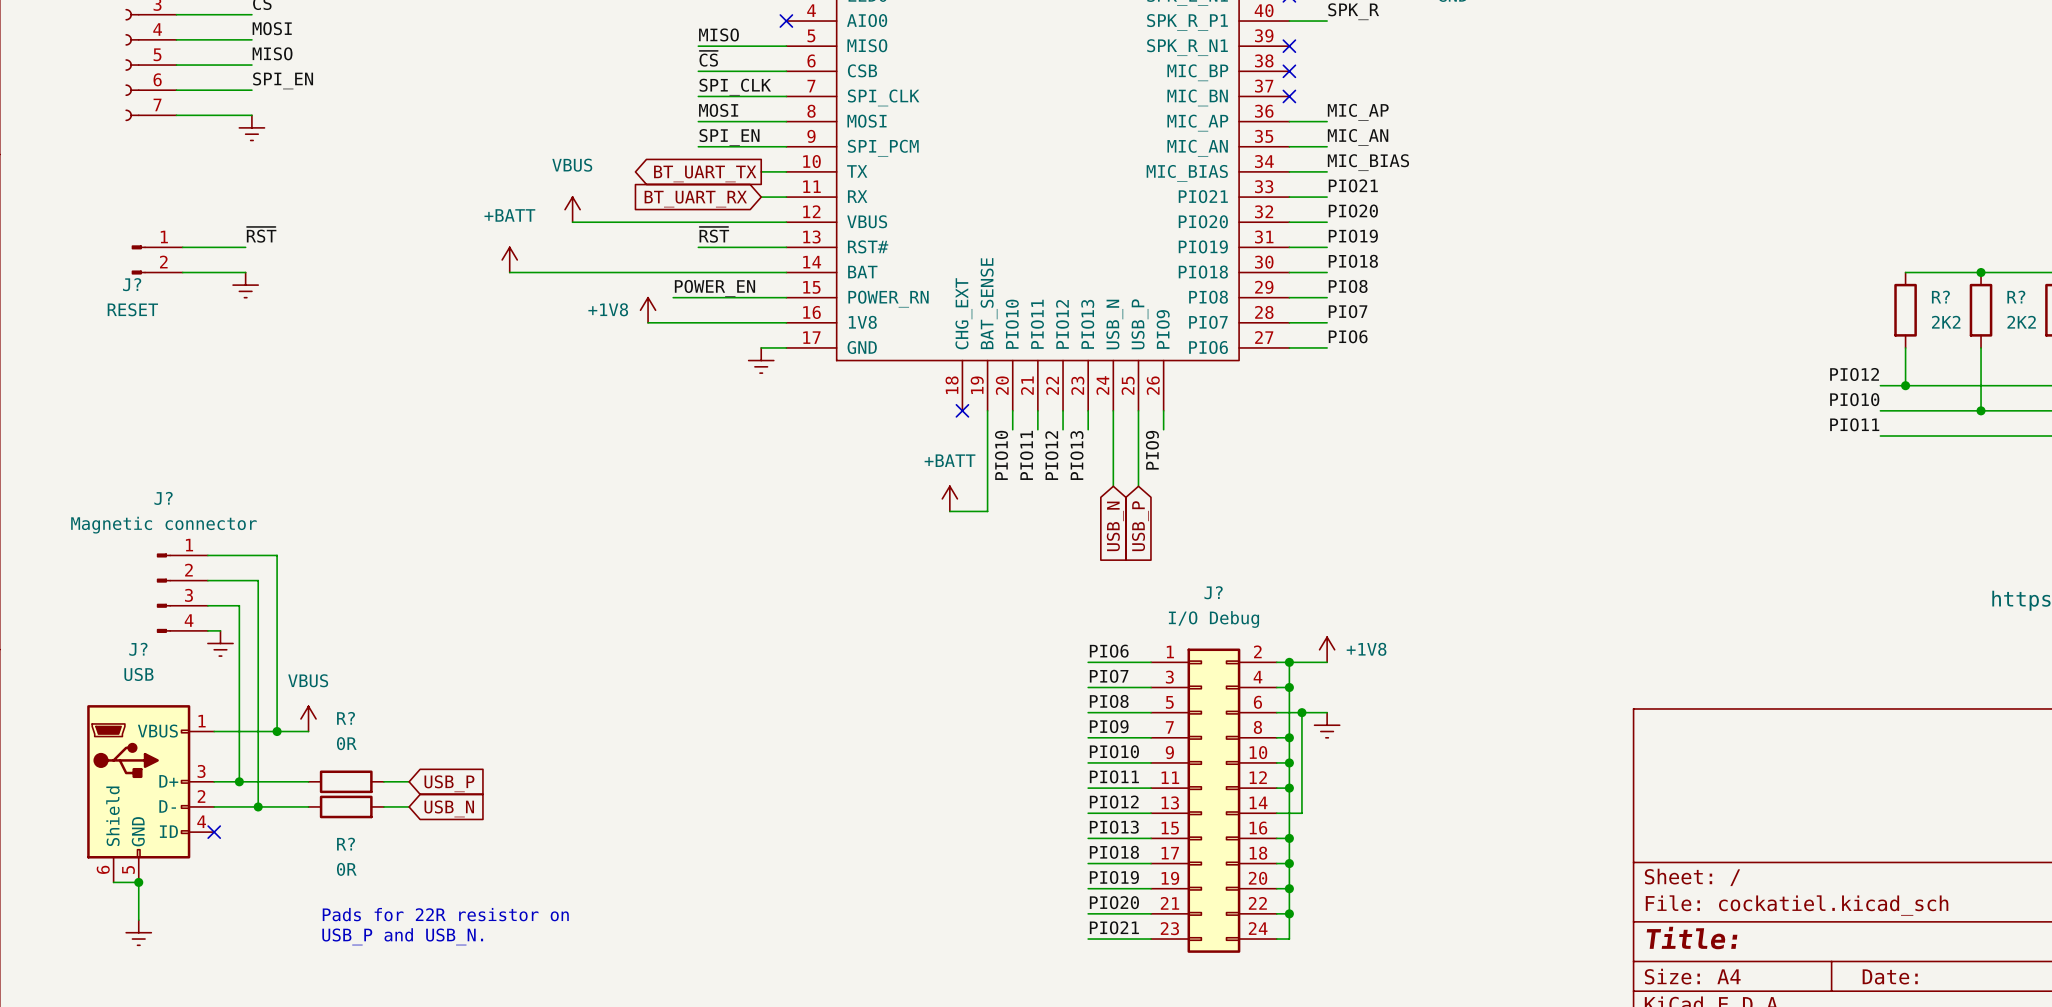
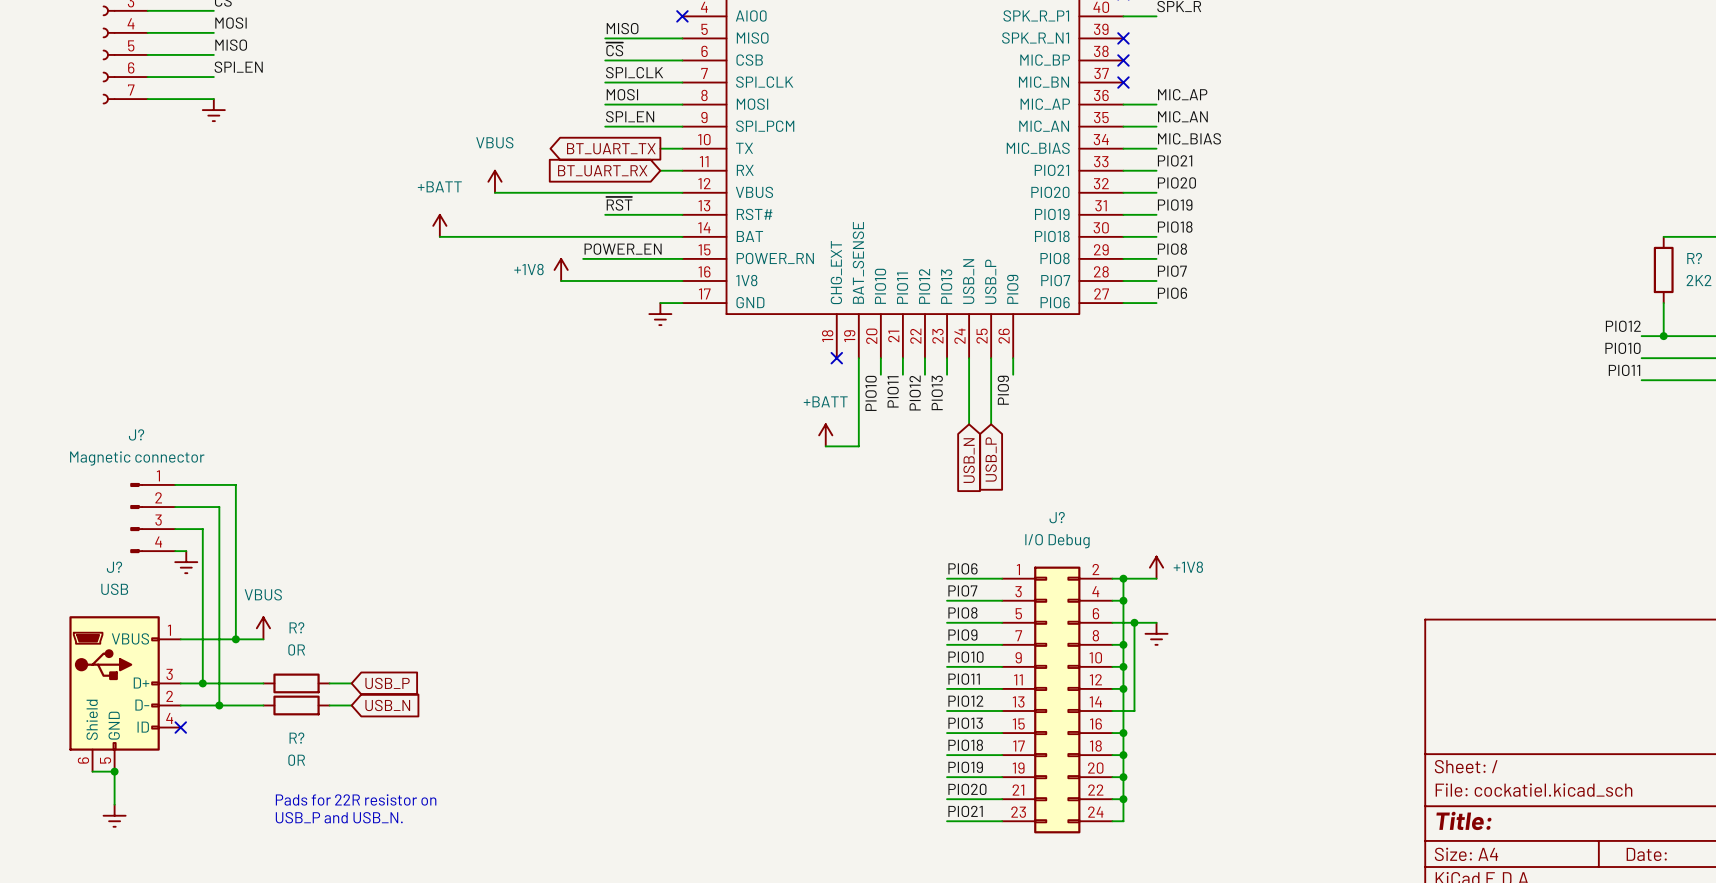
label: ~{RST} (261, 234) -> none
wire: (182, 247) (245, 247) -> none
J?: RESET (157, 259) -> none
wire: (182, 272) (245, 272) -> none
power symbol: (245, 285) -> none

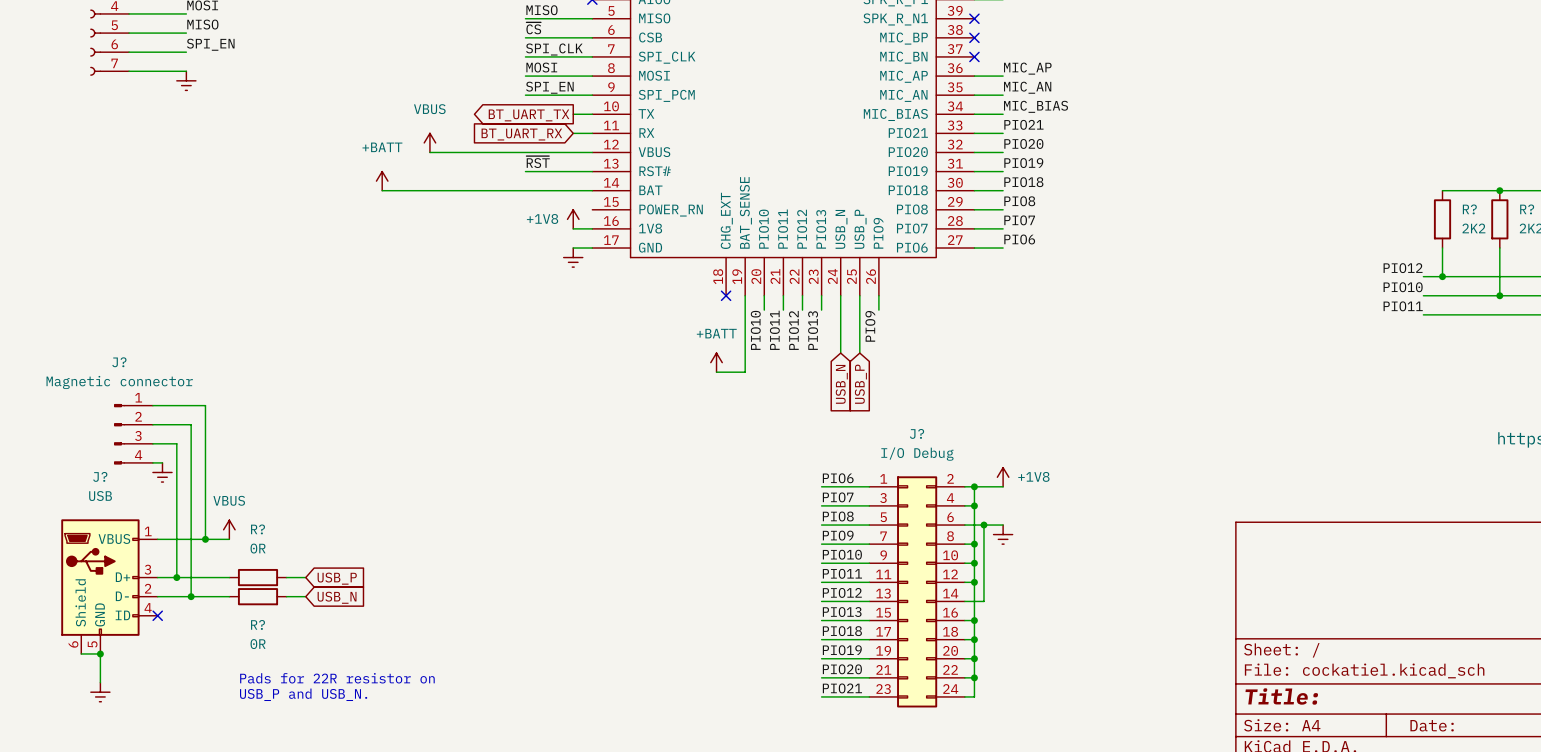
label: POWER_EN (623, 249) -> none
wire: (583, 258) (682, 258) -> none
power symbol position: +1V8 (561, 269) -> +1V8 (573, 219)
wire: (561, 280) (660, 280) -> none

